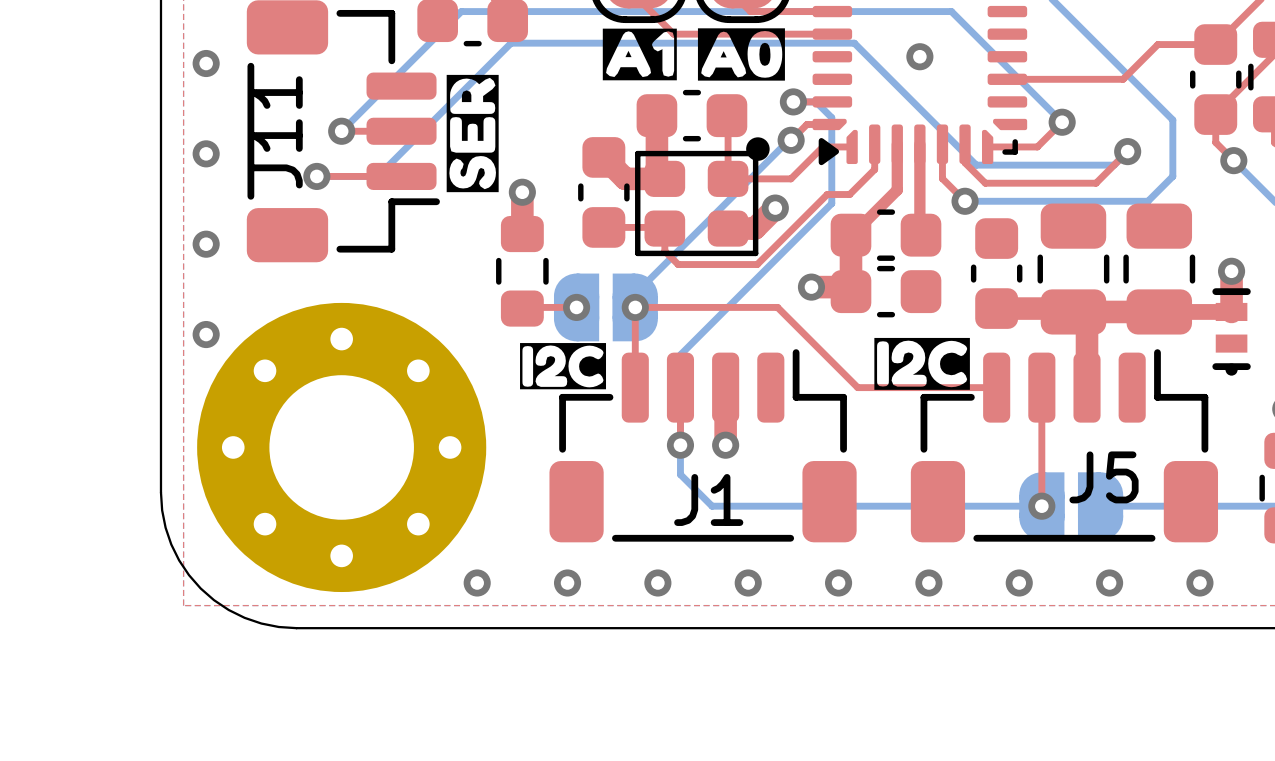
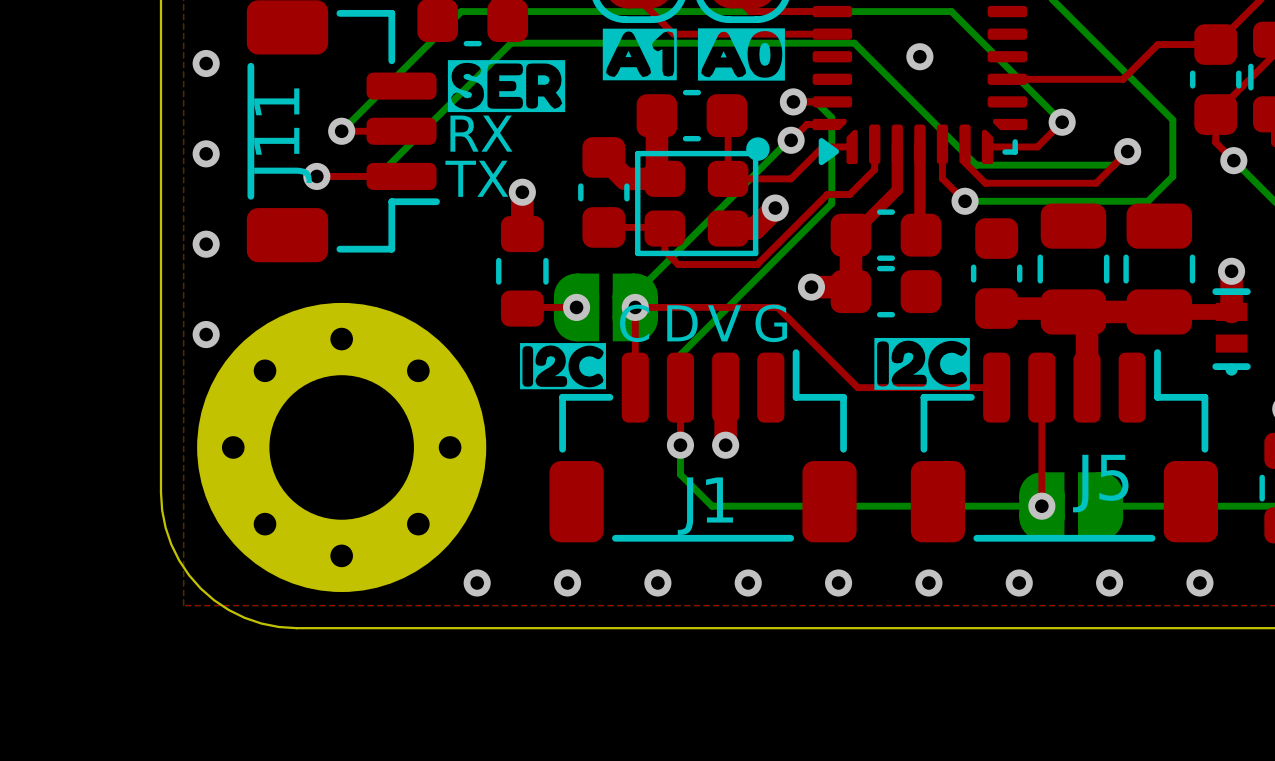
drawing: none -> [447, 60, 566, 113]
drawing: [446, 74, 499, 193] -> none
text: none -> RX (481, 133)
text: none -> TX (476, 178)
text: none -> C (634, 323)
text: none -> D (682, 323)
text: none -> V (724, 323)
text: none -> G (771, 323)

